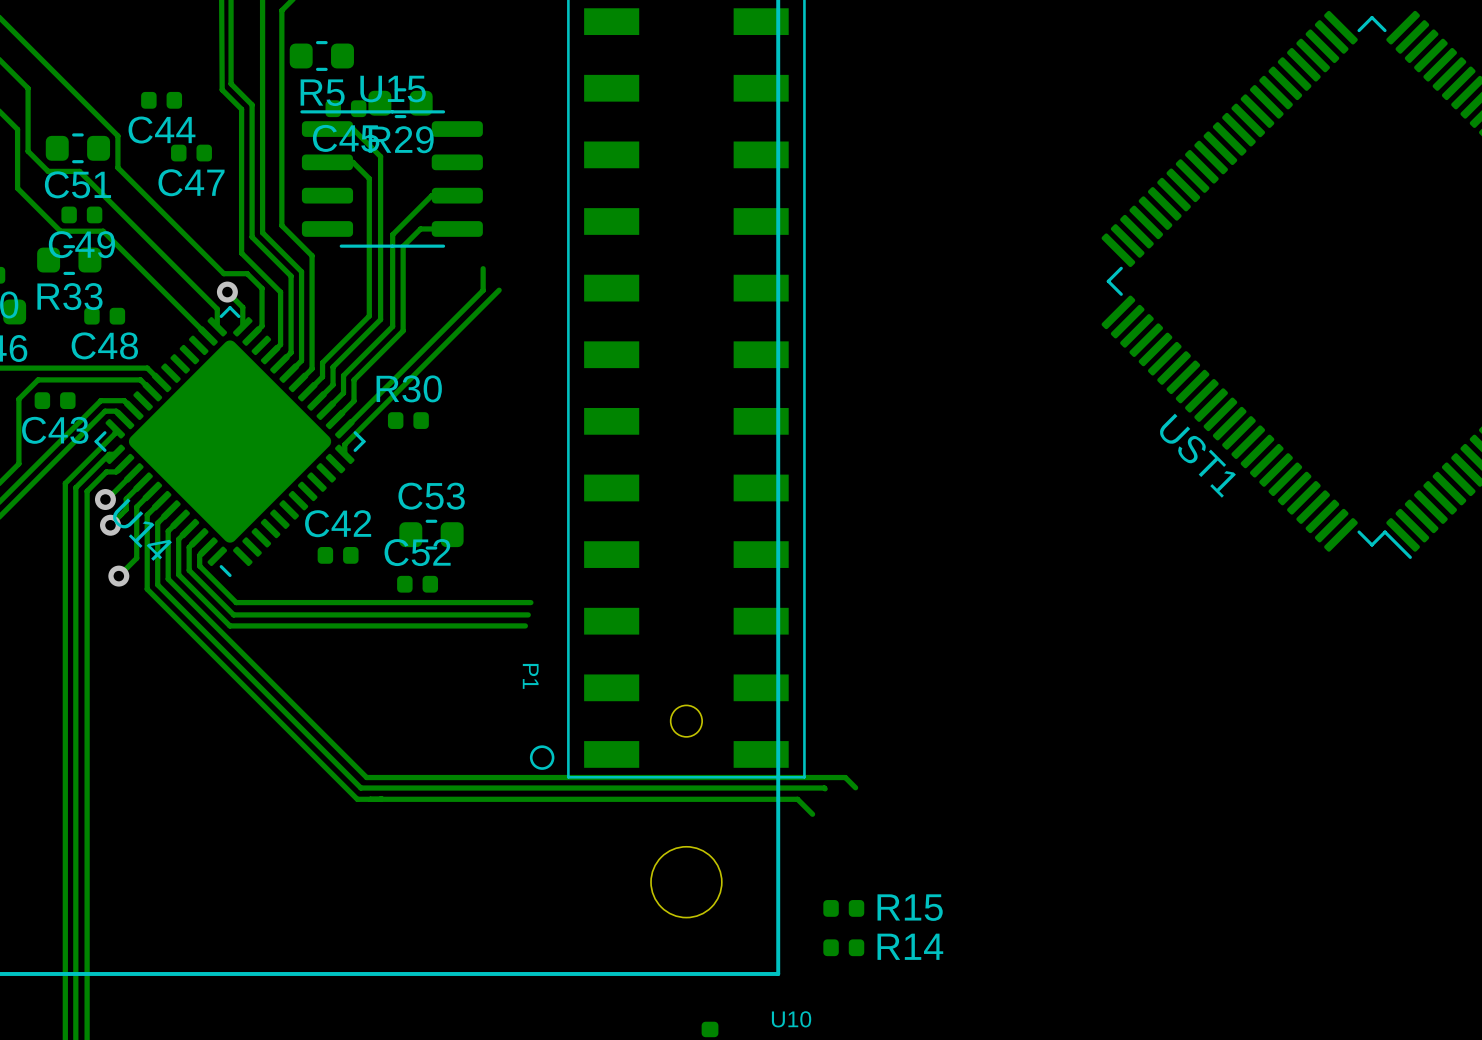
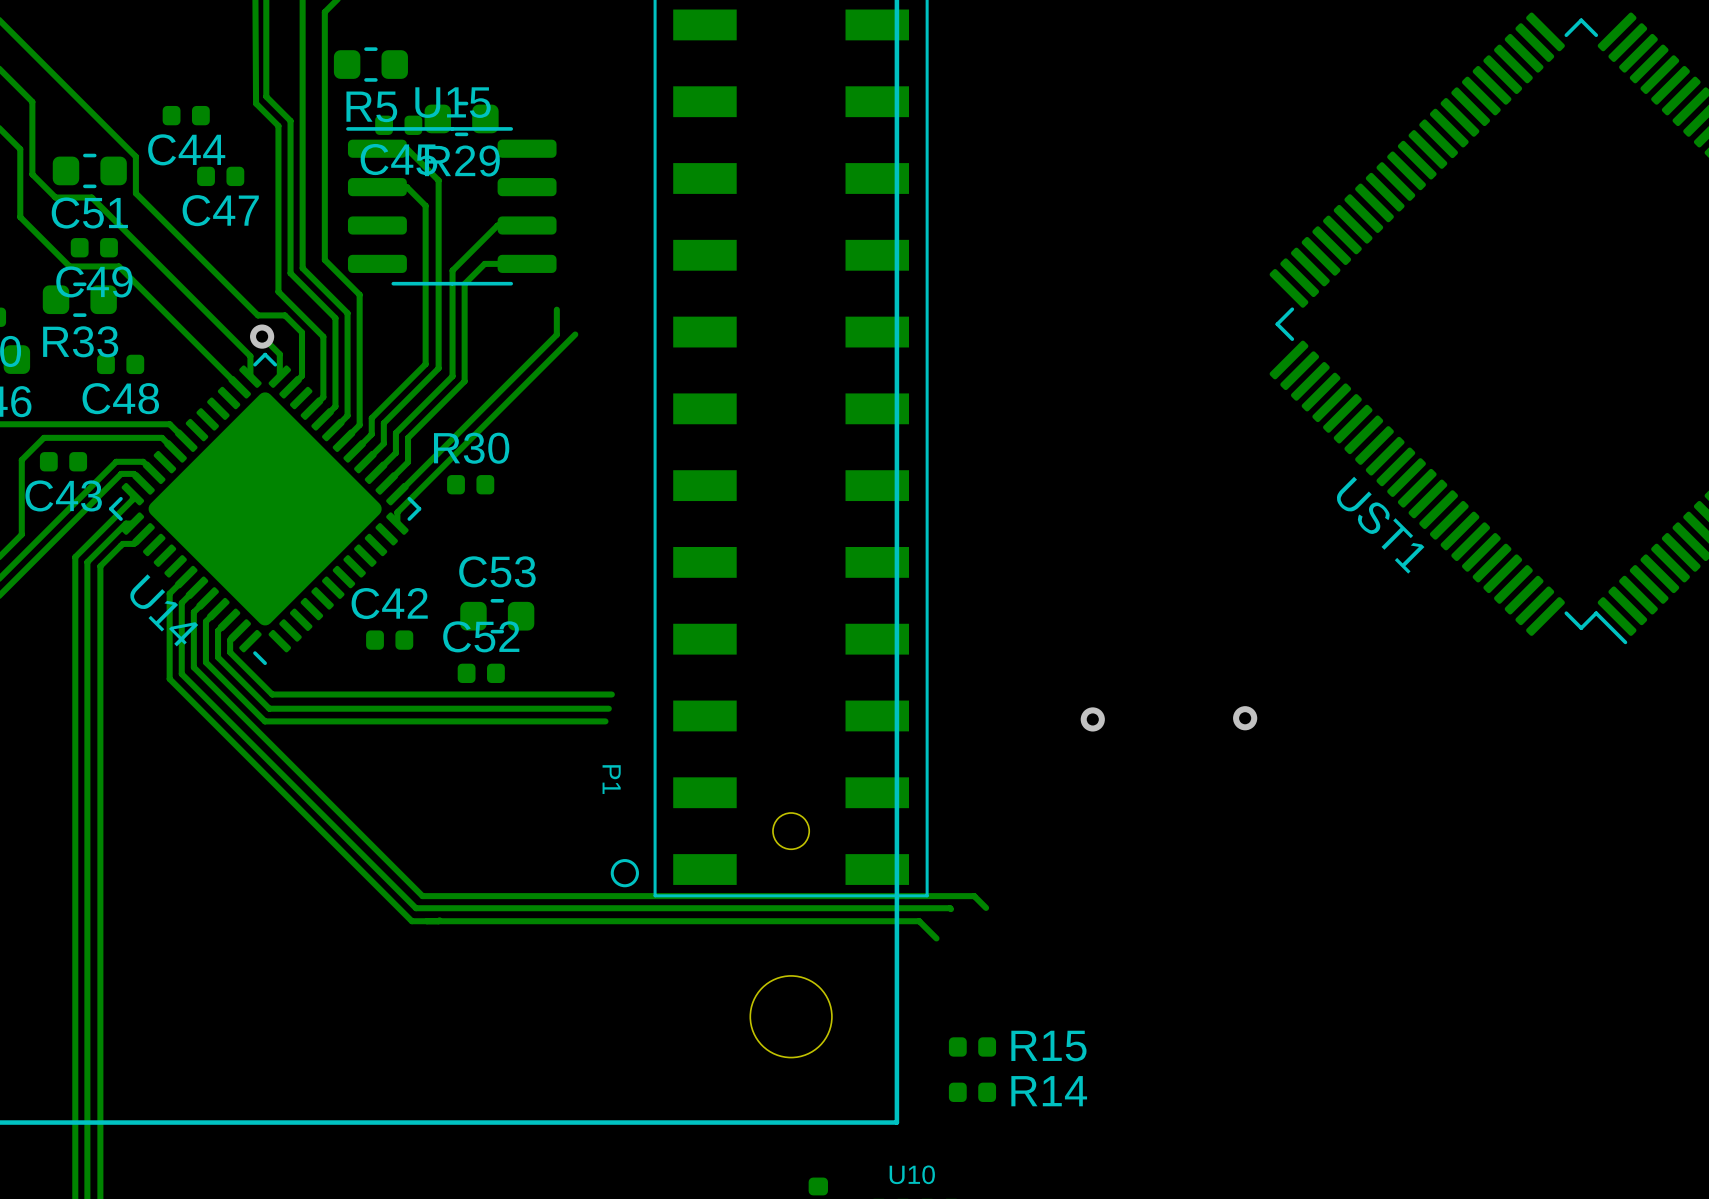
track: (133, 472) (105, 499) -> none
track: (143, 482) (126, 499) (126, 509) (110, 525) -> none
track: (152, 491) (136, 507) (136, 558) (118, 576) -> none
via: (105, 499) -> none
via: (110, 525) -> none
via: (118, 576) -> none
via: none -> (1245, 718)
via: none -> (1092, 719)

